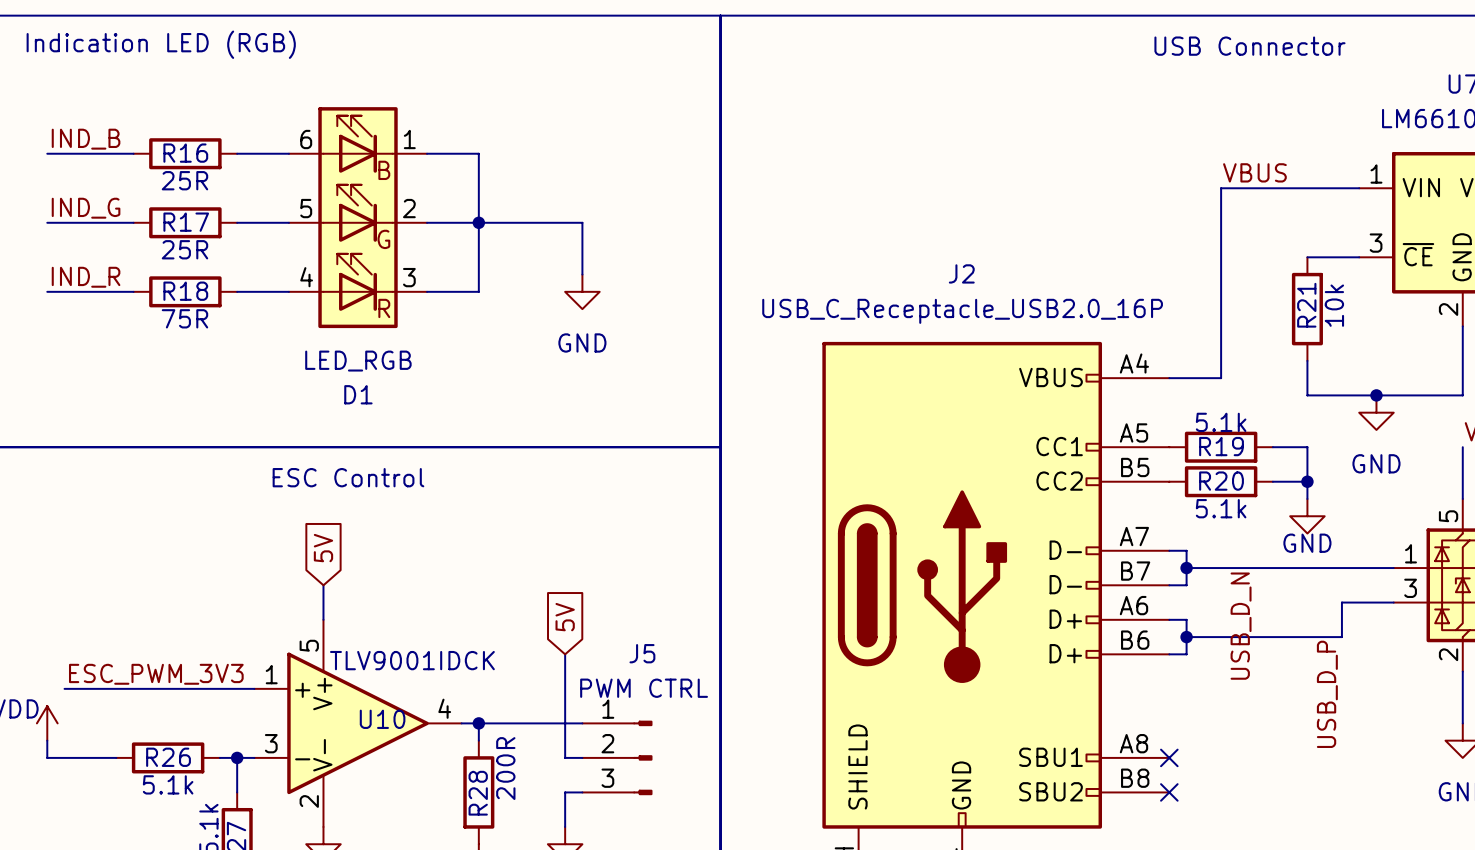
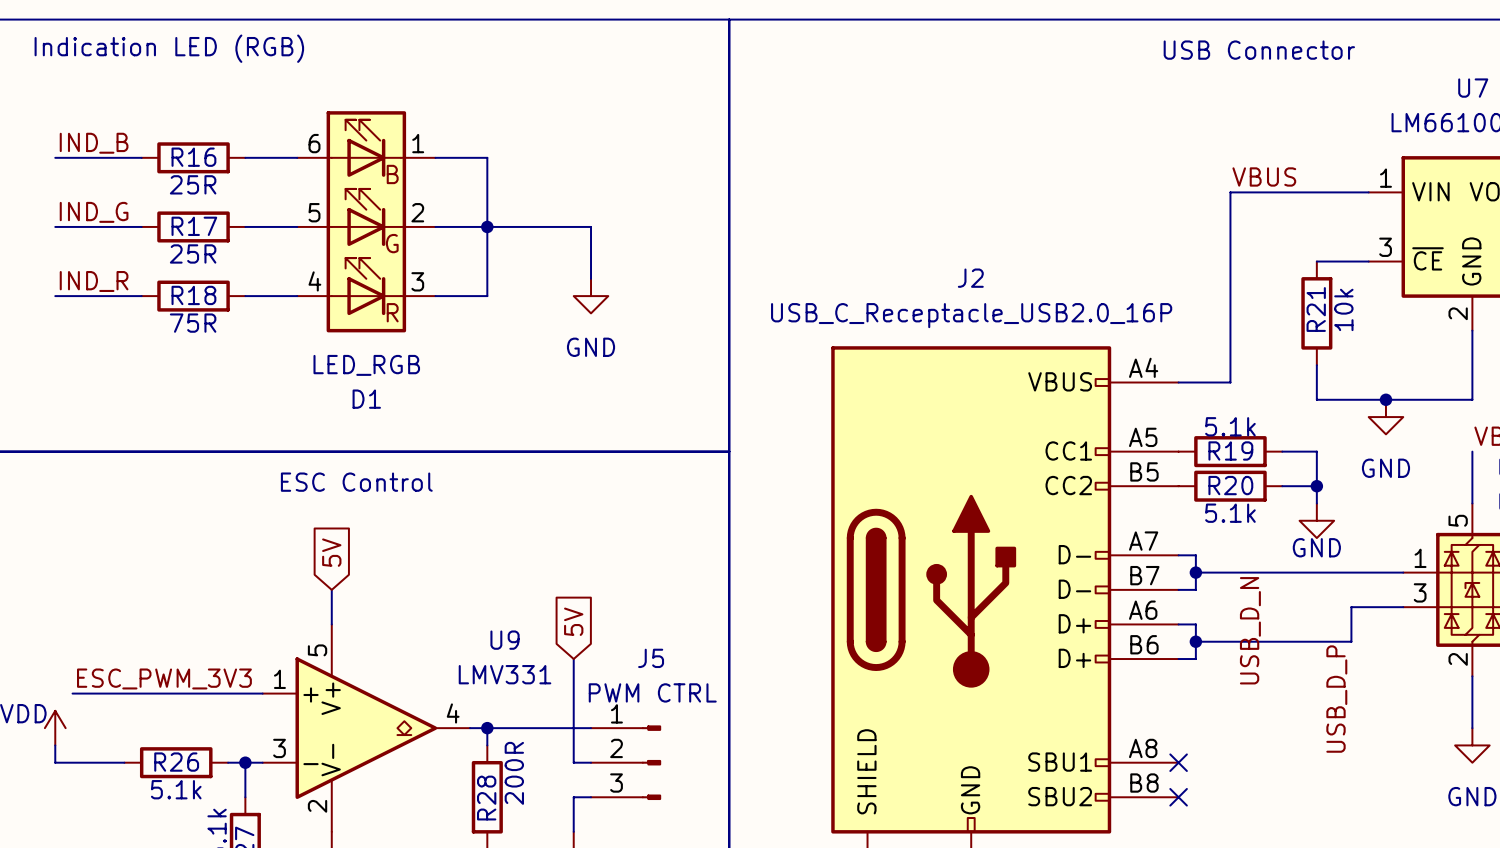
U10: TLV9001IDCK (358, 723) -> none
U9: none -> LMV331 (366, 728)

